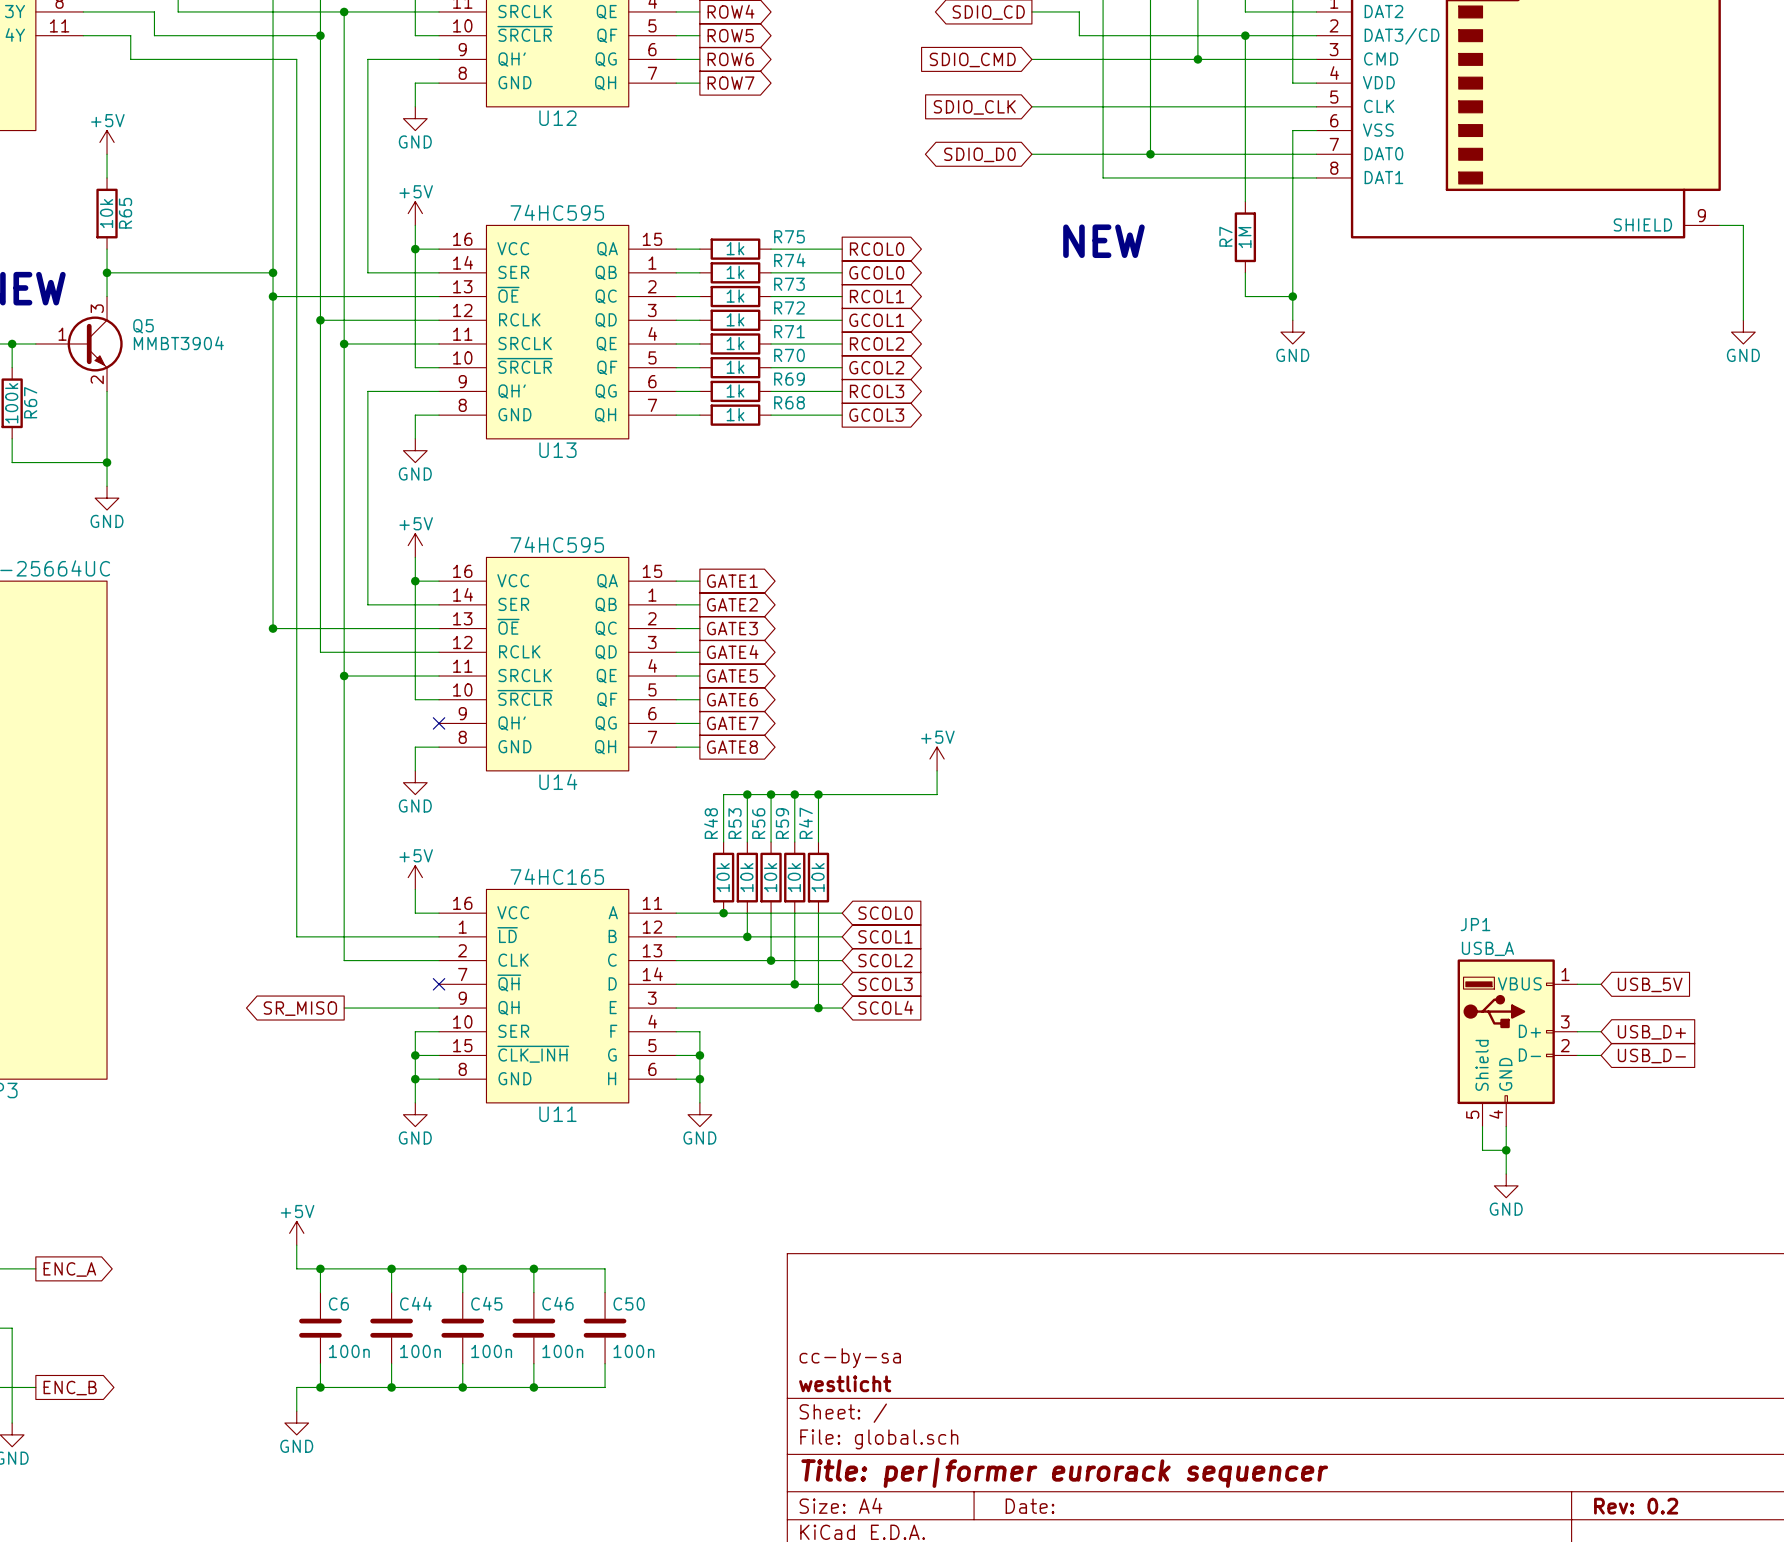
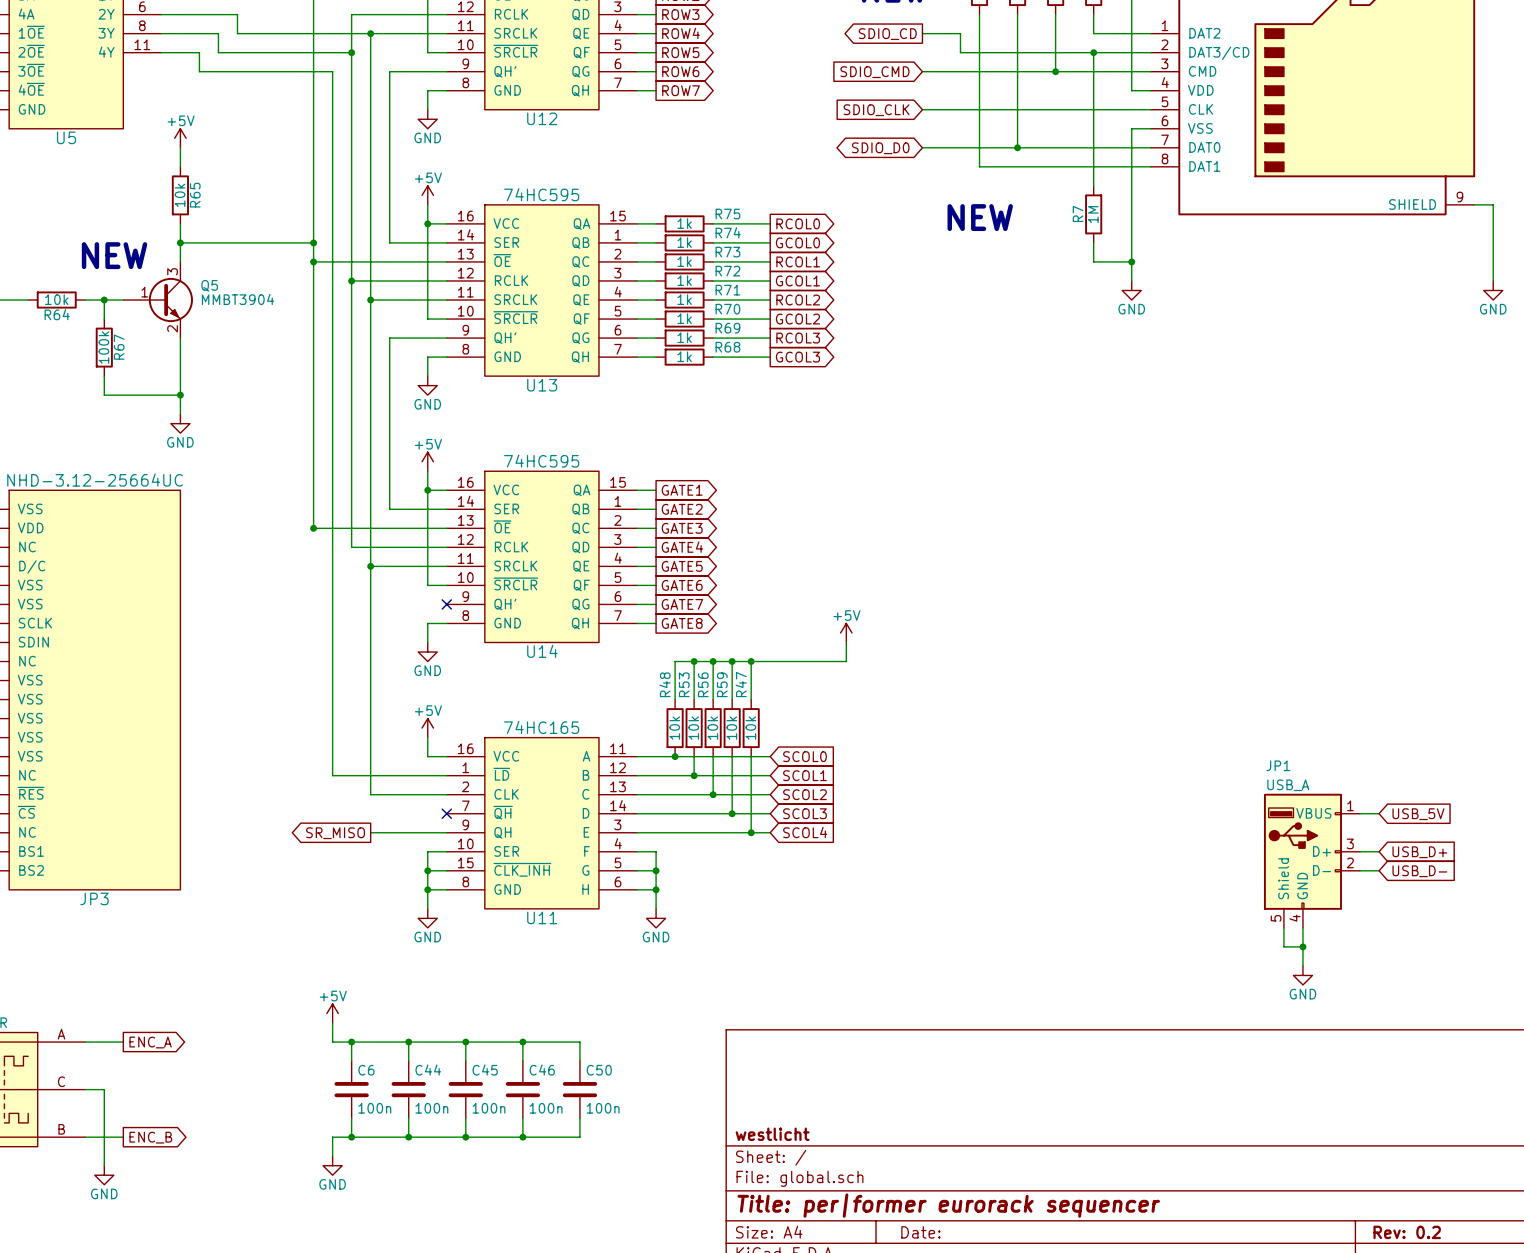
title block: cc-by-sa (850, 1358) -> none

